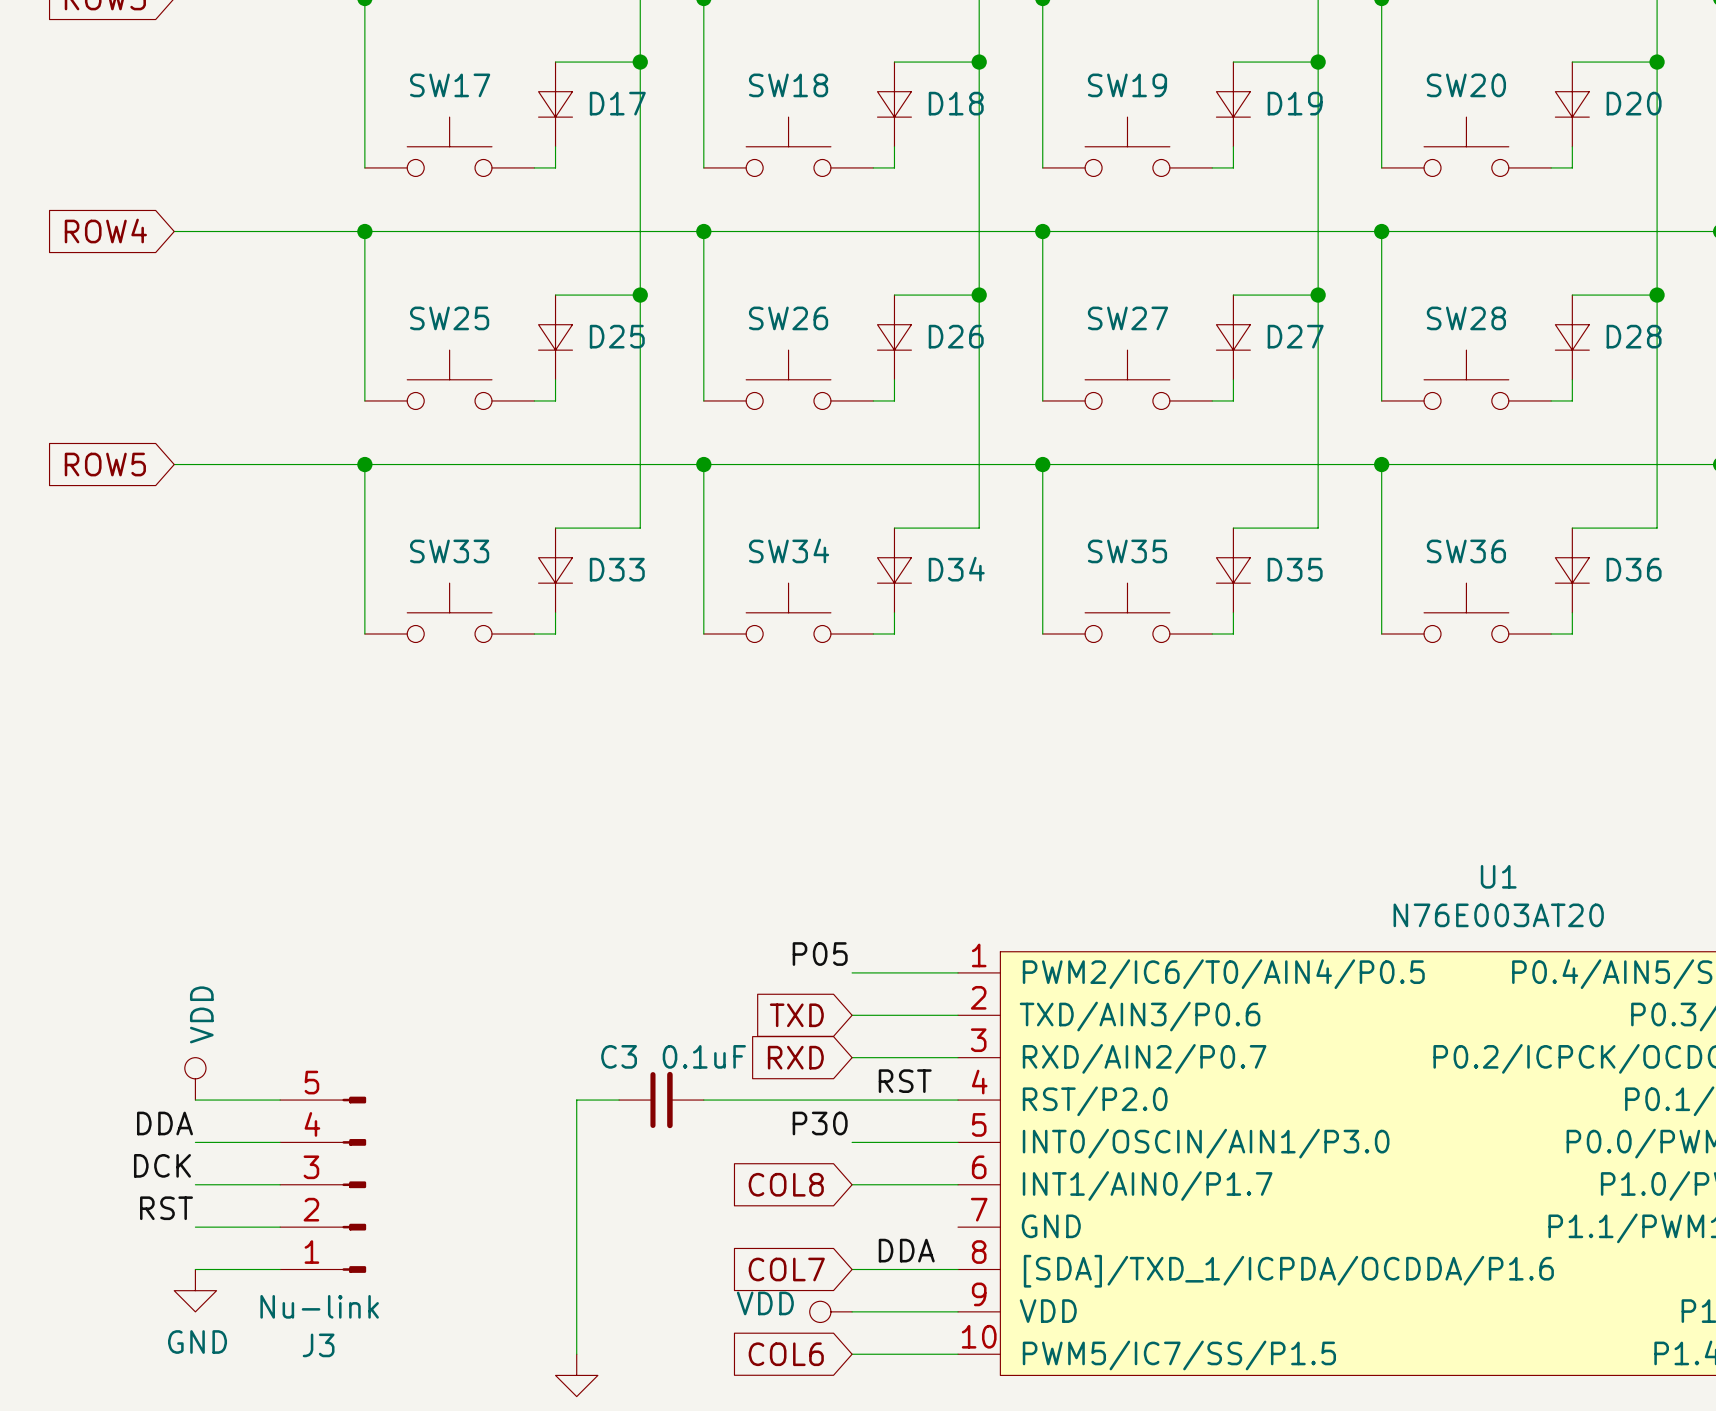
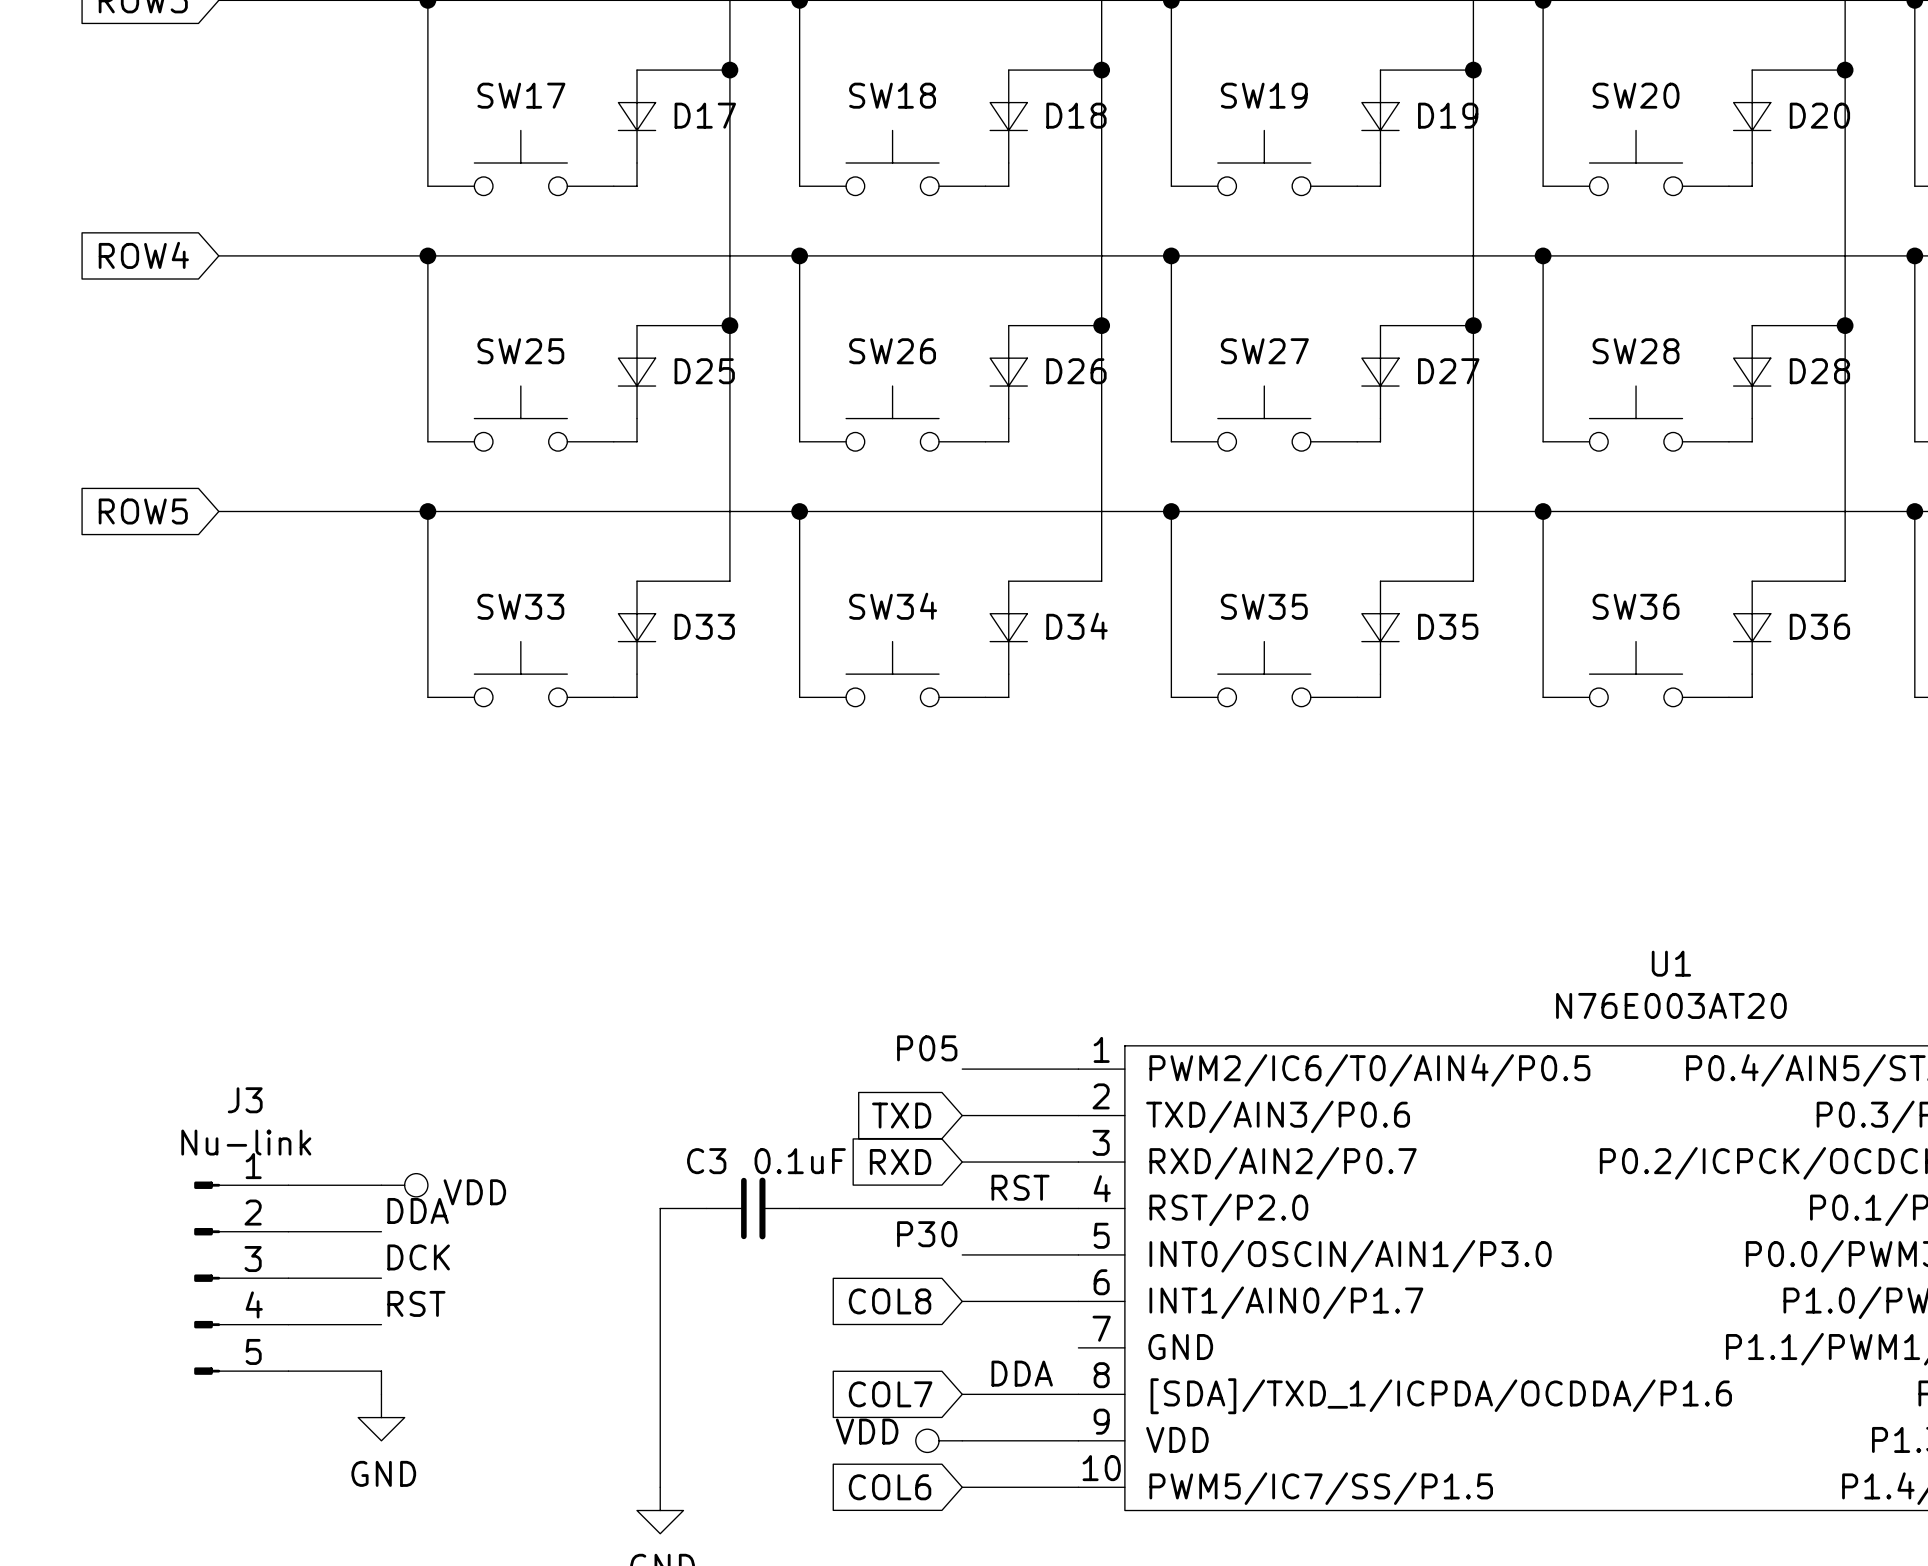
power symbol rotation: 0° (195, 1078) -> 90° clockwise (404, 1185)
power symbol position: VDD (195, 1078) -> VDD (404, 1185)
wire: (195, 1100) (280, 1100) -> (288, 1185) (381, 1185)
label position: DDA (164, 1123) -> DDA (418, 1210)
wire: (195, 1142) (280, 1142) -> (288, 1231) (381, 1231)
label position: DCK (162, 1165) -> DCK (418, 1257)
wire: (195, 1184) (280, 1184) -> (288, 1278) (381, 1278)
J3 position: (323, 1184) -> (241, 1278)
J3 rotation: 0° (354, 1184) -> 180° (207, 1278)
label position: RST (166, 1208) -> RST (416, 1303)
wire: (195, 1227) (280, 1227) -> (288, 1324) (381, 1324)
wire: none -> (288, 1371) (381, 1371) (381, 1394)
wire: (195, 1269) (280, 1269) -> none
power symbol position: GND (195, 1290) -> GND (381, 1417)

